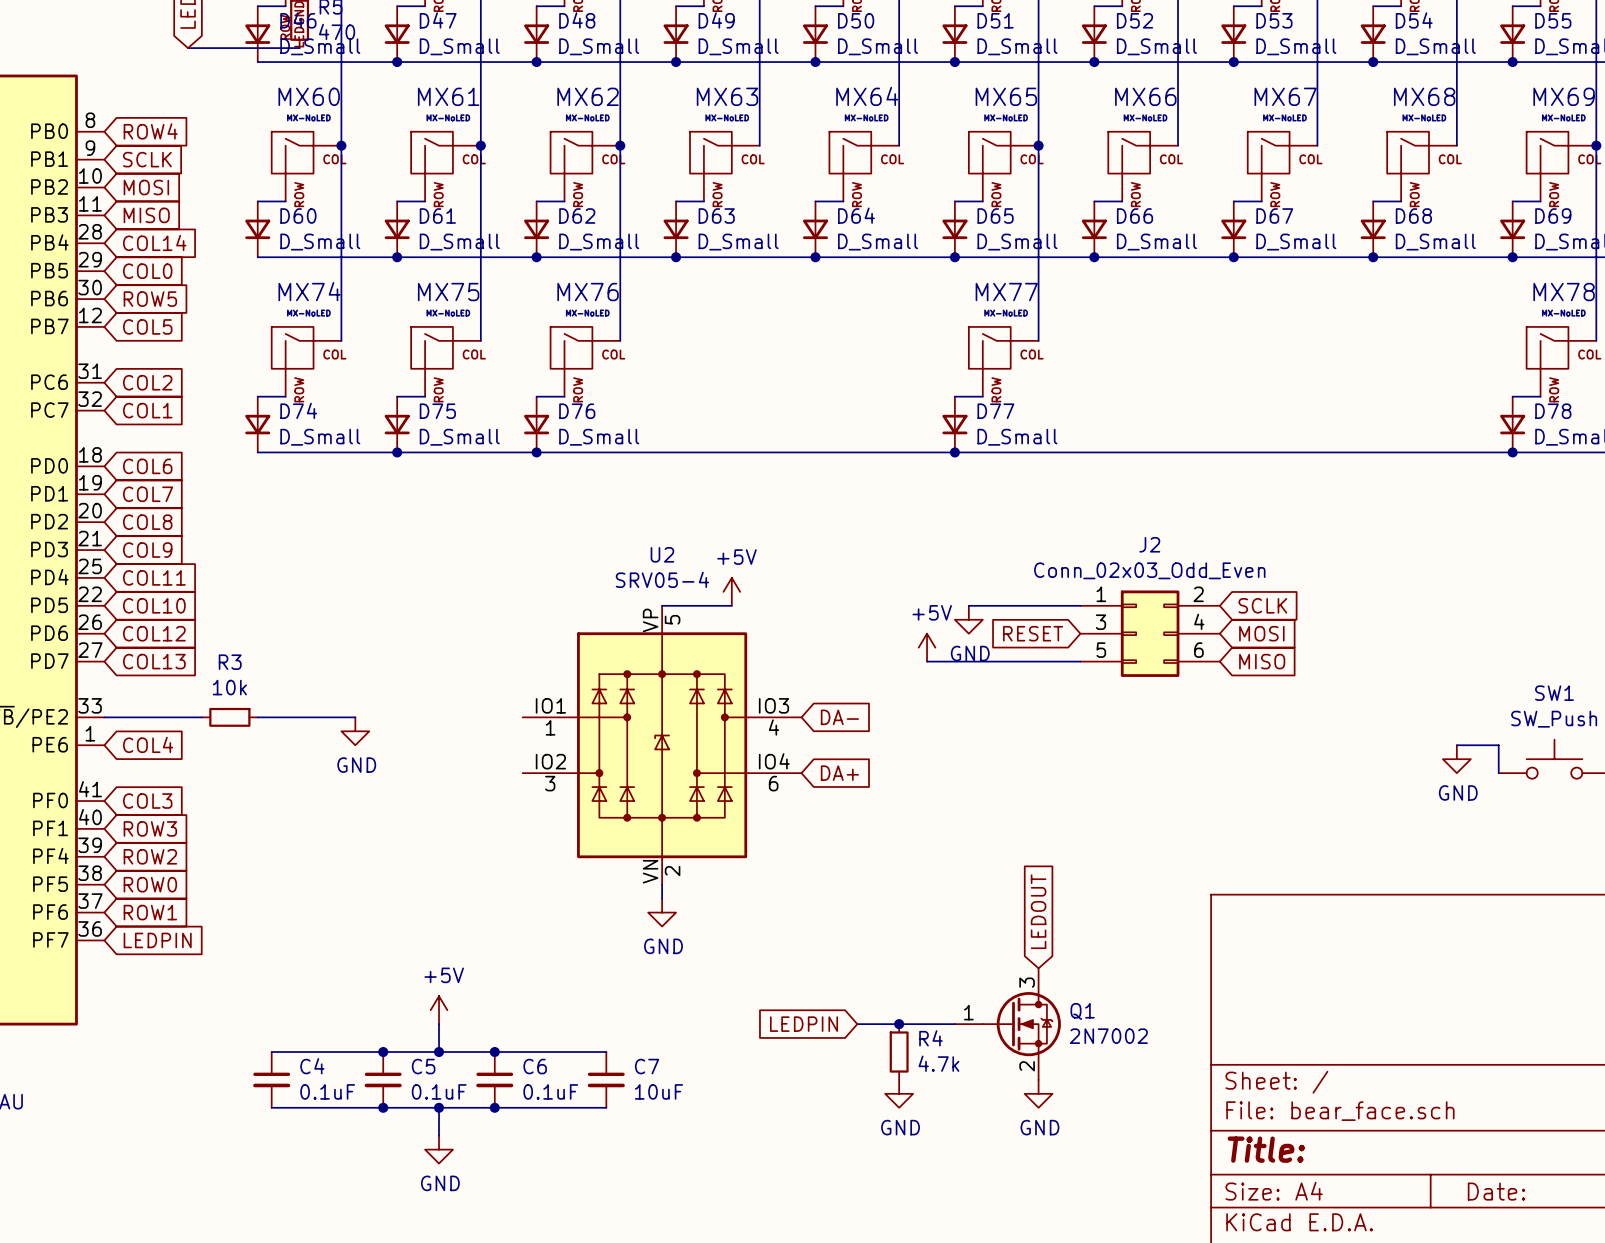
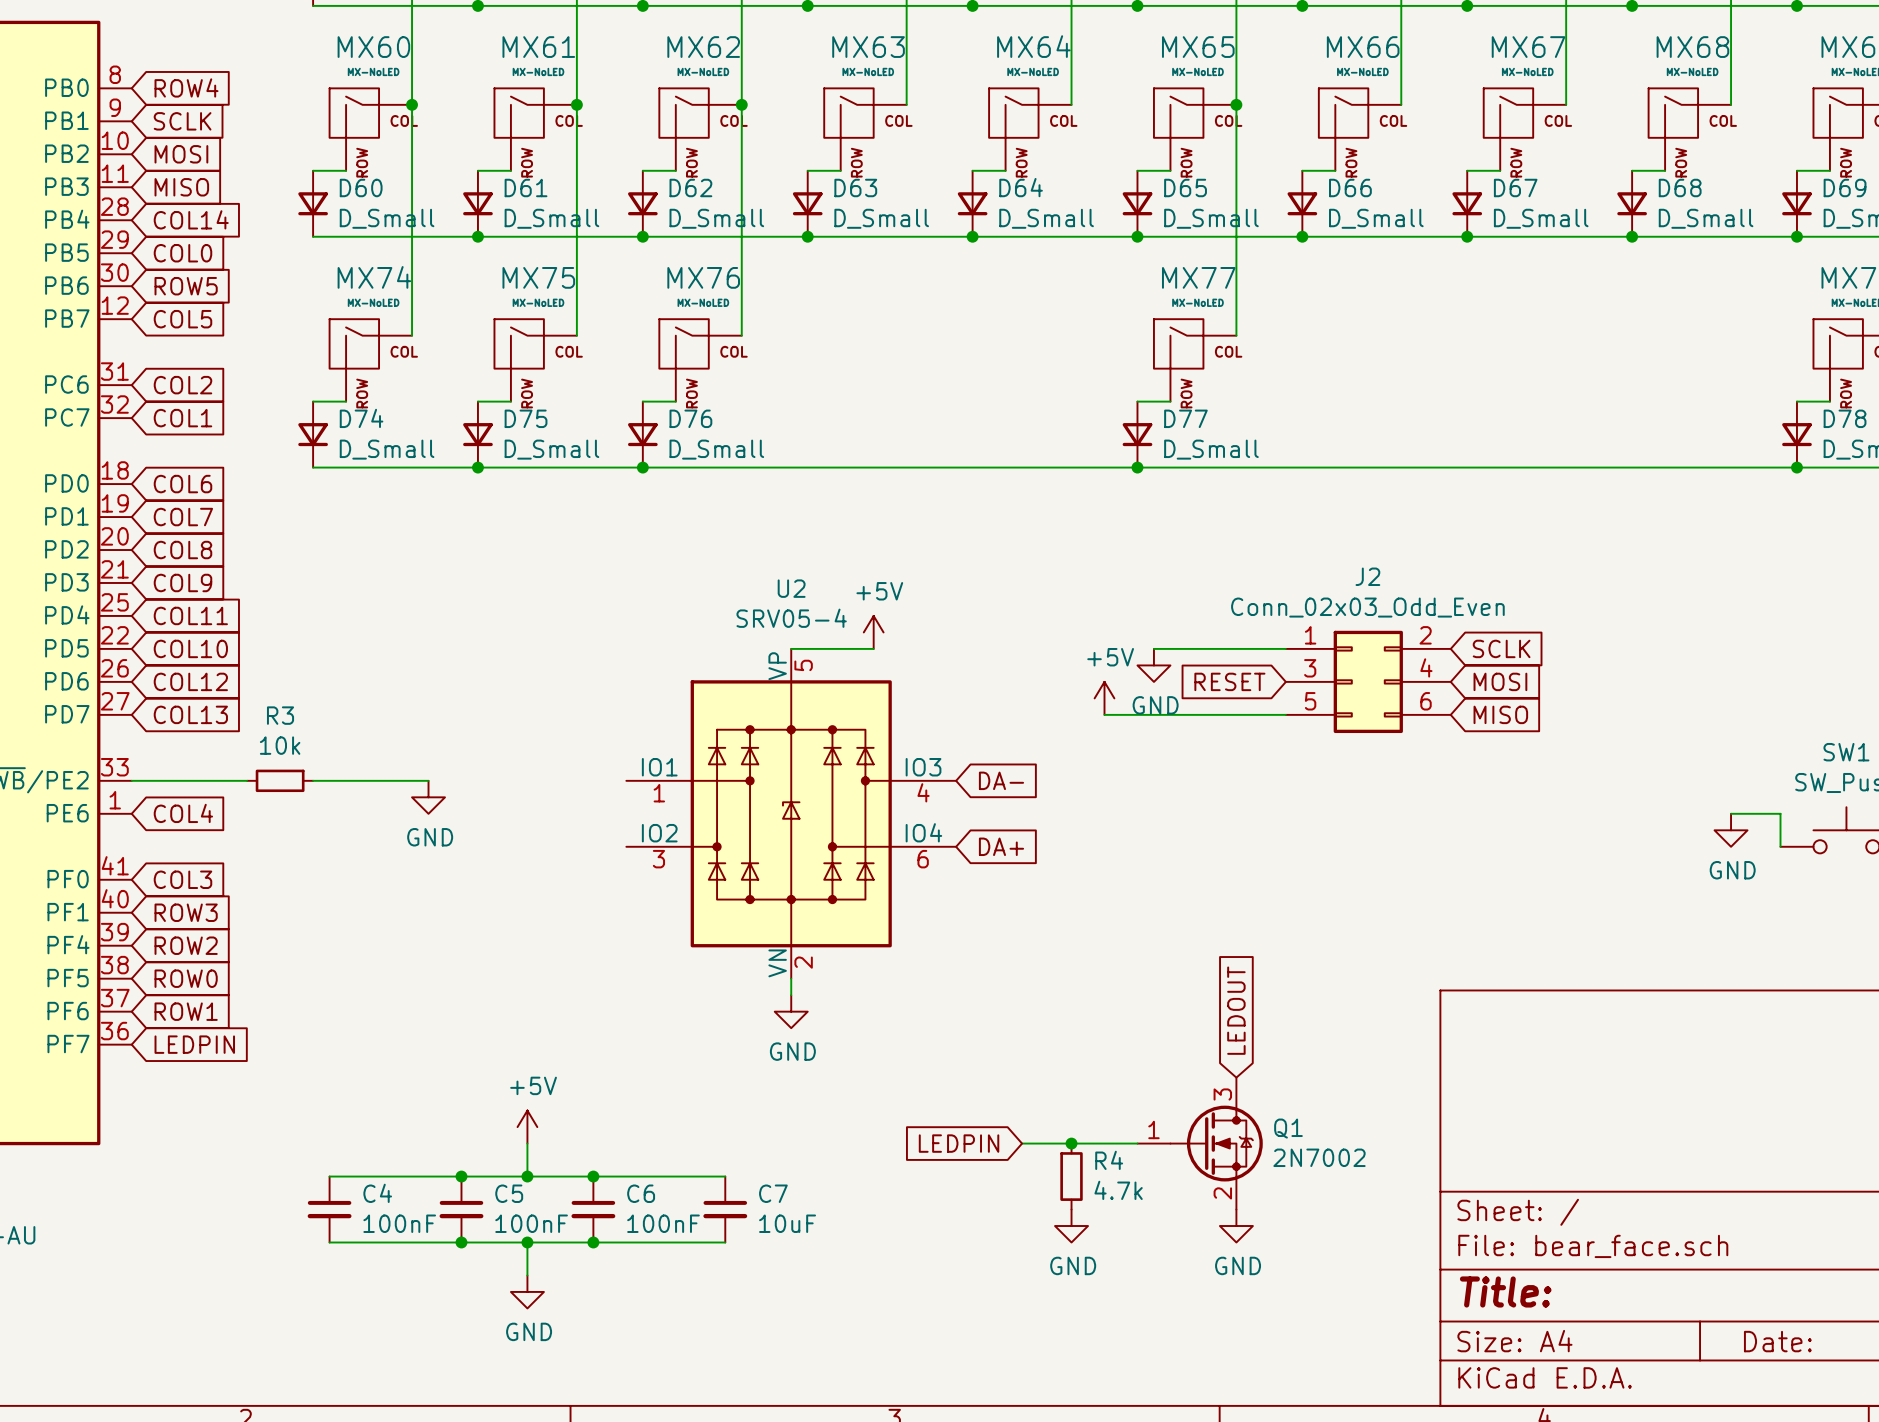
C4 value: 0.1uF (327, 1091) -> 100nF (399, 1223)
C5 value: 0.1uF (439, 1091) -> 100nF (531, 1223)
C6 value: 0.1uF (550, 1091) -> 100nF (663, 1223)

